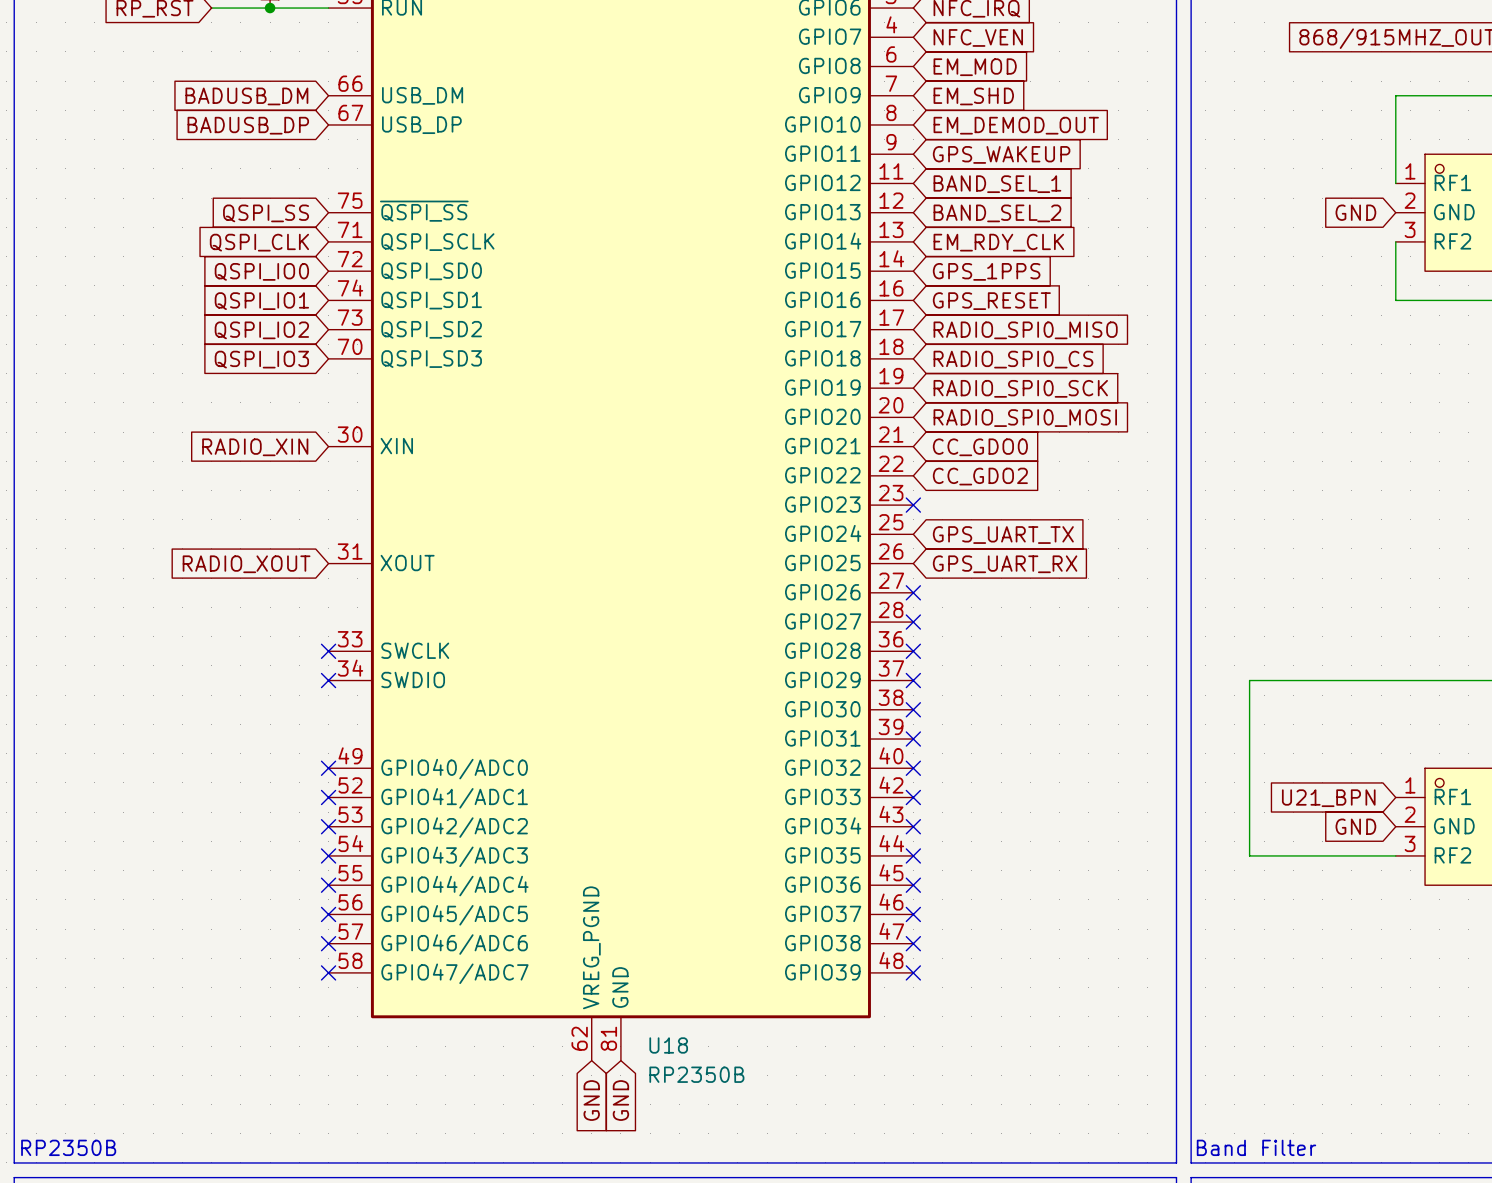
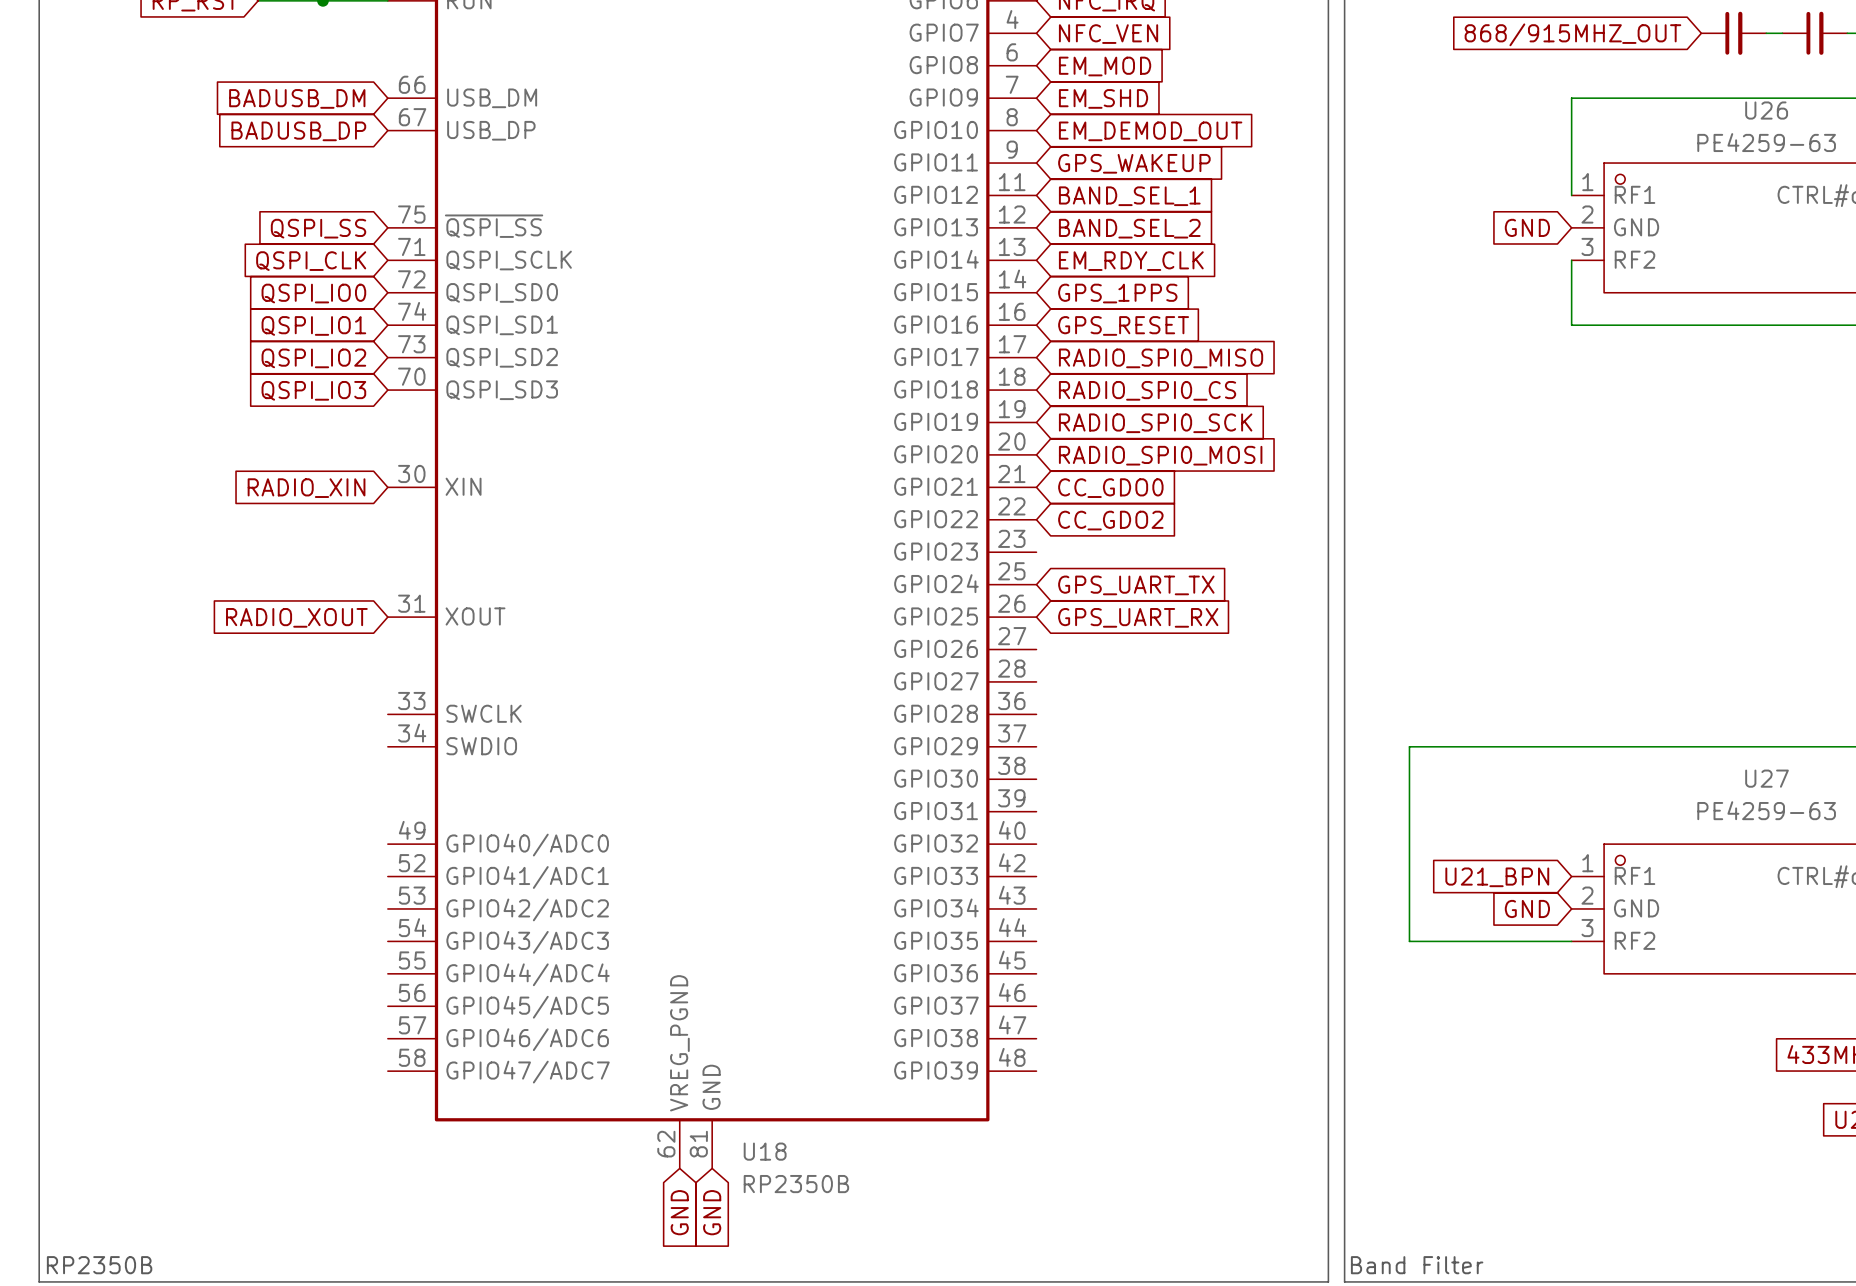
no-connect mark: (913, 505) -> none
no-connect mark: (913, 592) -> none
no-connect mark: (913, 622) -> none
no-connect mark: (328, 651) -> none
no-connect mark: (913, 651) -> none
no-connect mark: (328, 680) -> none
no-connect mark: (913, 680) -> none
no-connect mark: (913, 709) -> none
no-connect mark: (913, 739) -> none
no-connect mark: (328, 768) -> none
no-connect mark: (913, 768) -> none
no-connect mark: (328, 797) -> none
no-connect mark: (913, 797) -> none
no-connect mark: (328, 826) -> none
no-connect mark: (913, 826) -> none
no-connect mark: (328, 855) -> none
no-connect mark: (913, 855) -> none
no-connect mark: (328, 885) -> none
no-connect mark: (913, 885) -> none
no-connect mark: (328, 914) -> none
no-connect mark: (913, 914) -> none
no-connect mark: (328, 943) -> none
no-connect mark: (913, 943) -> none
no-connect mark: (328, 972) -> none
no-connect mark: (913, 972) -> none

